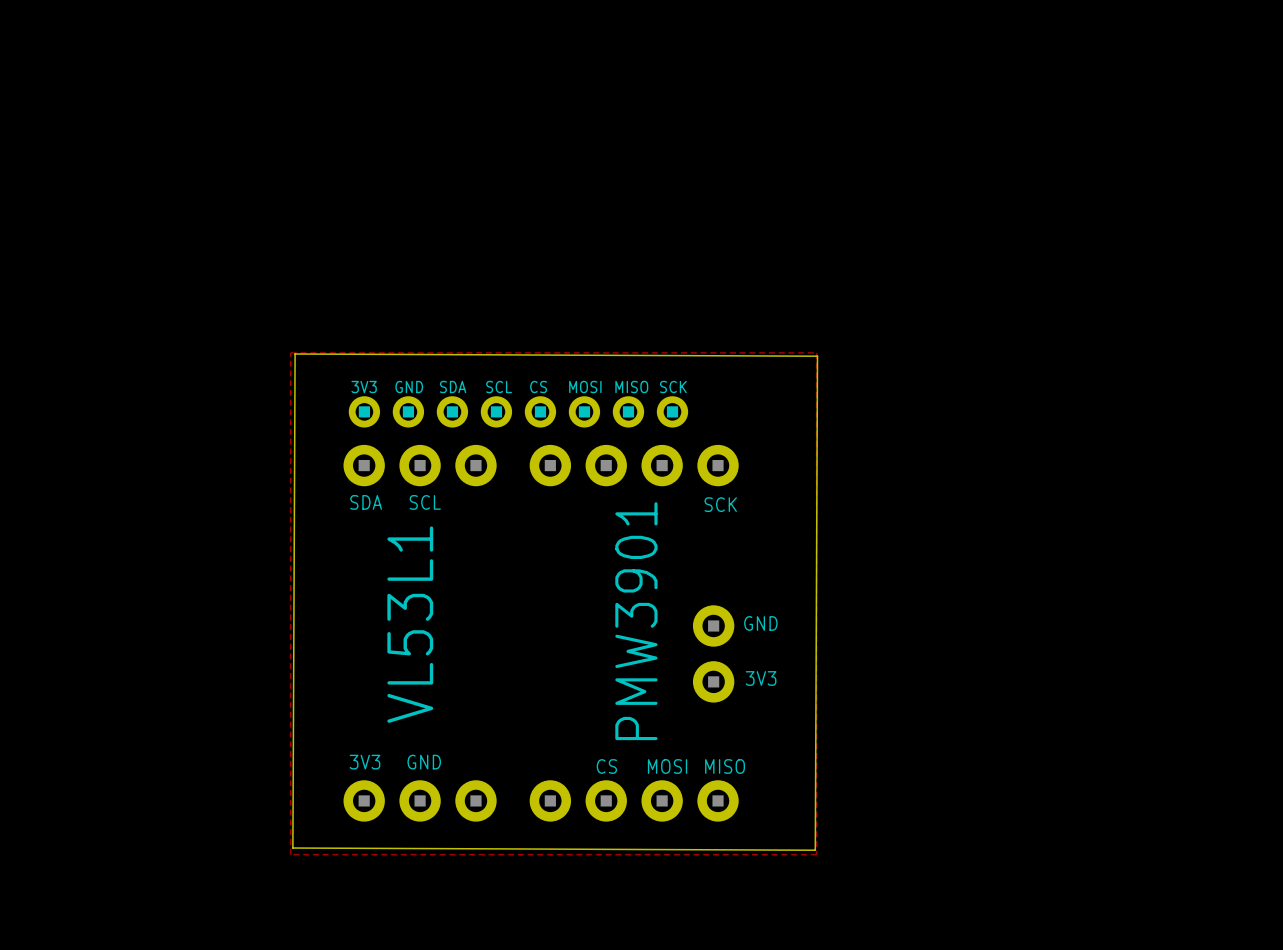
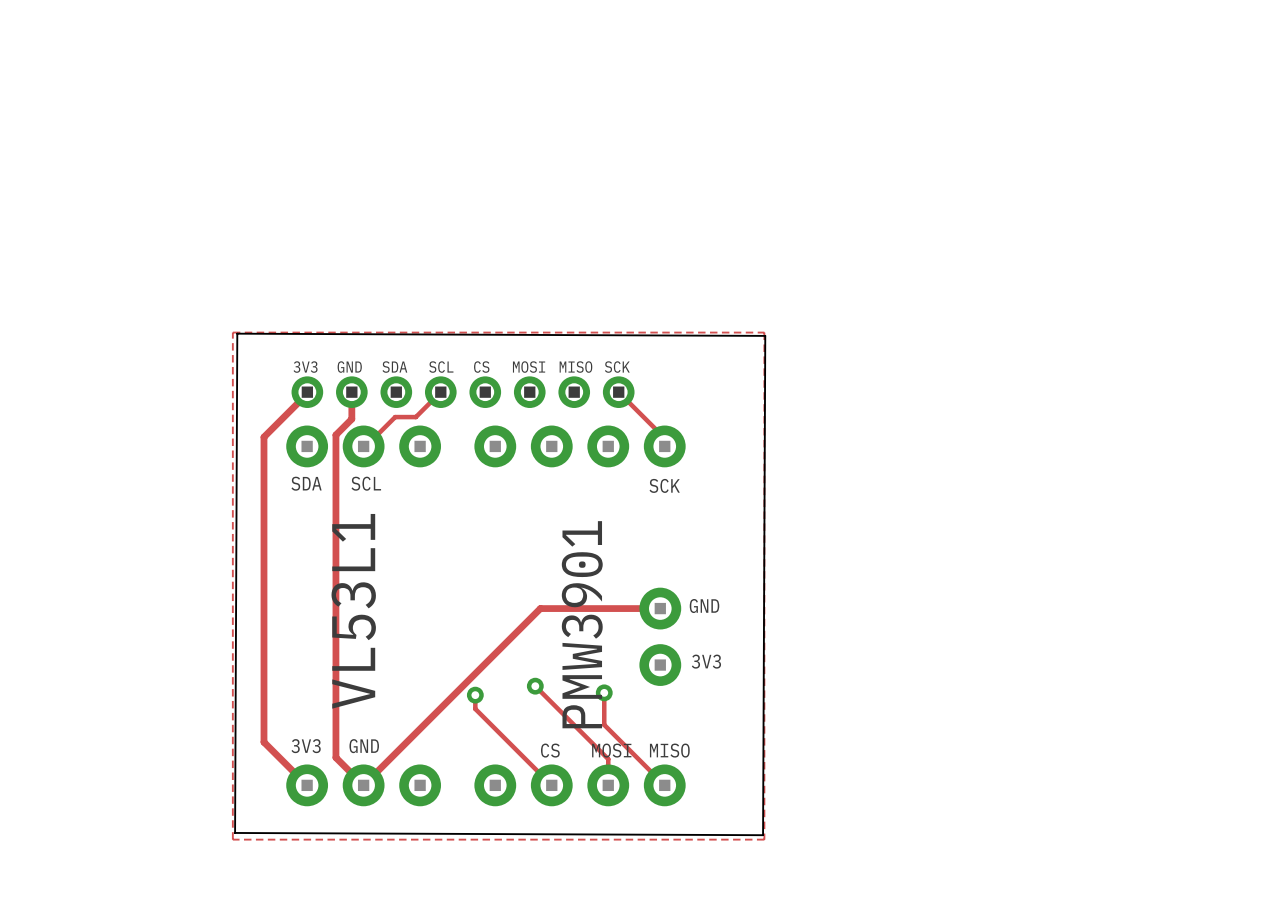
track: none -> (307, 392) (263, 437) (263, 742) (307, 785)
track: none -> (351, 392) (351, 419) (335, 434) (335, 757) (363, 785) (540, 608) (660, 608)
track: none -> (440, 392) (415, 417) (395, 417) (365, 446) (363, 446)
track: none -> (618, 392) (664, 438) (664, 446)
track: none -> (535, 686) (608, 759) (608, 785)
via: none -> (535, 686)
track: none -> (604, 692) (604, 724) (664, 785)
via: none -> (604, 692)
track: none -> (475, 695) (475, 708) (551, 785)
via: none -> (475, 695)

